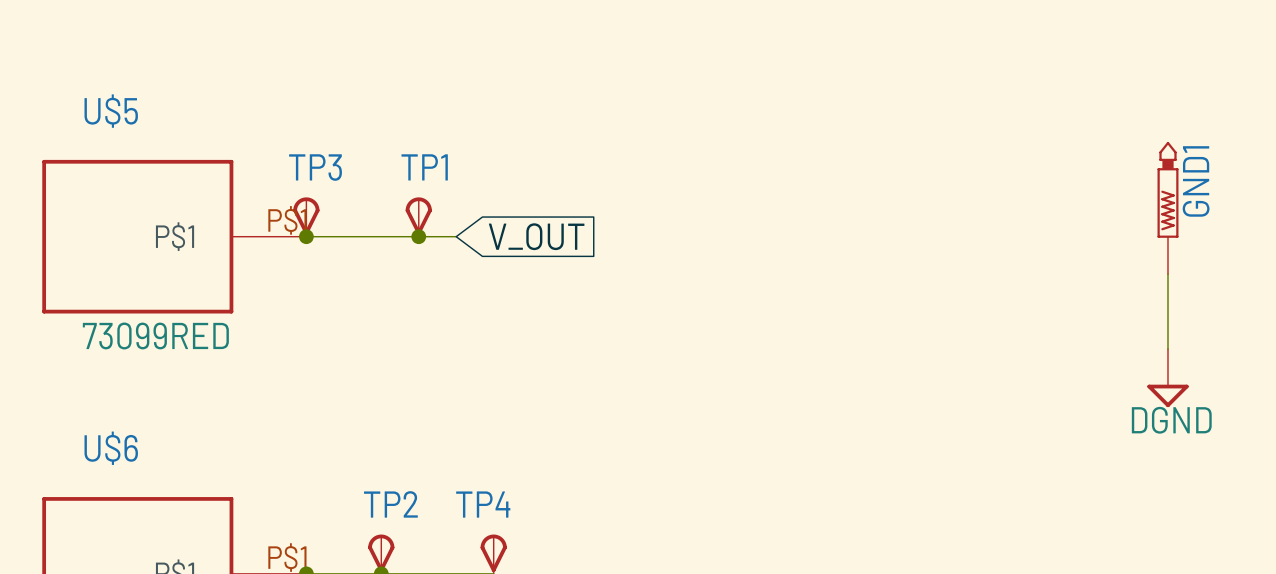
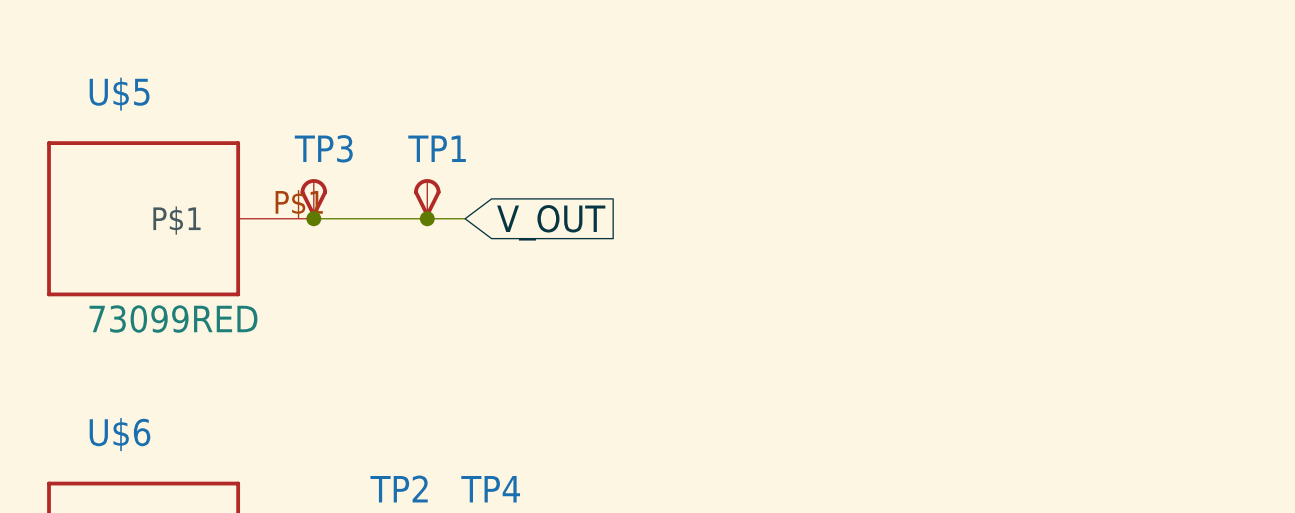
GND1: (1167, 208) -> none
wire: (1167, 274) (1167, 349) -> none
power symbol: DGND (1167, 378) -> none

